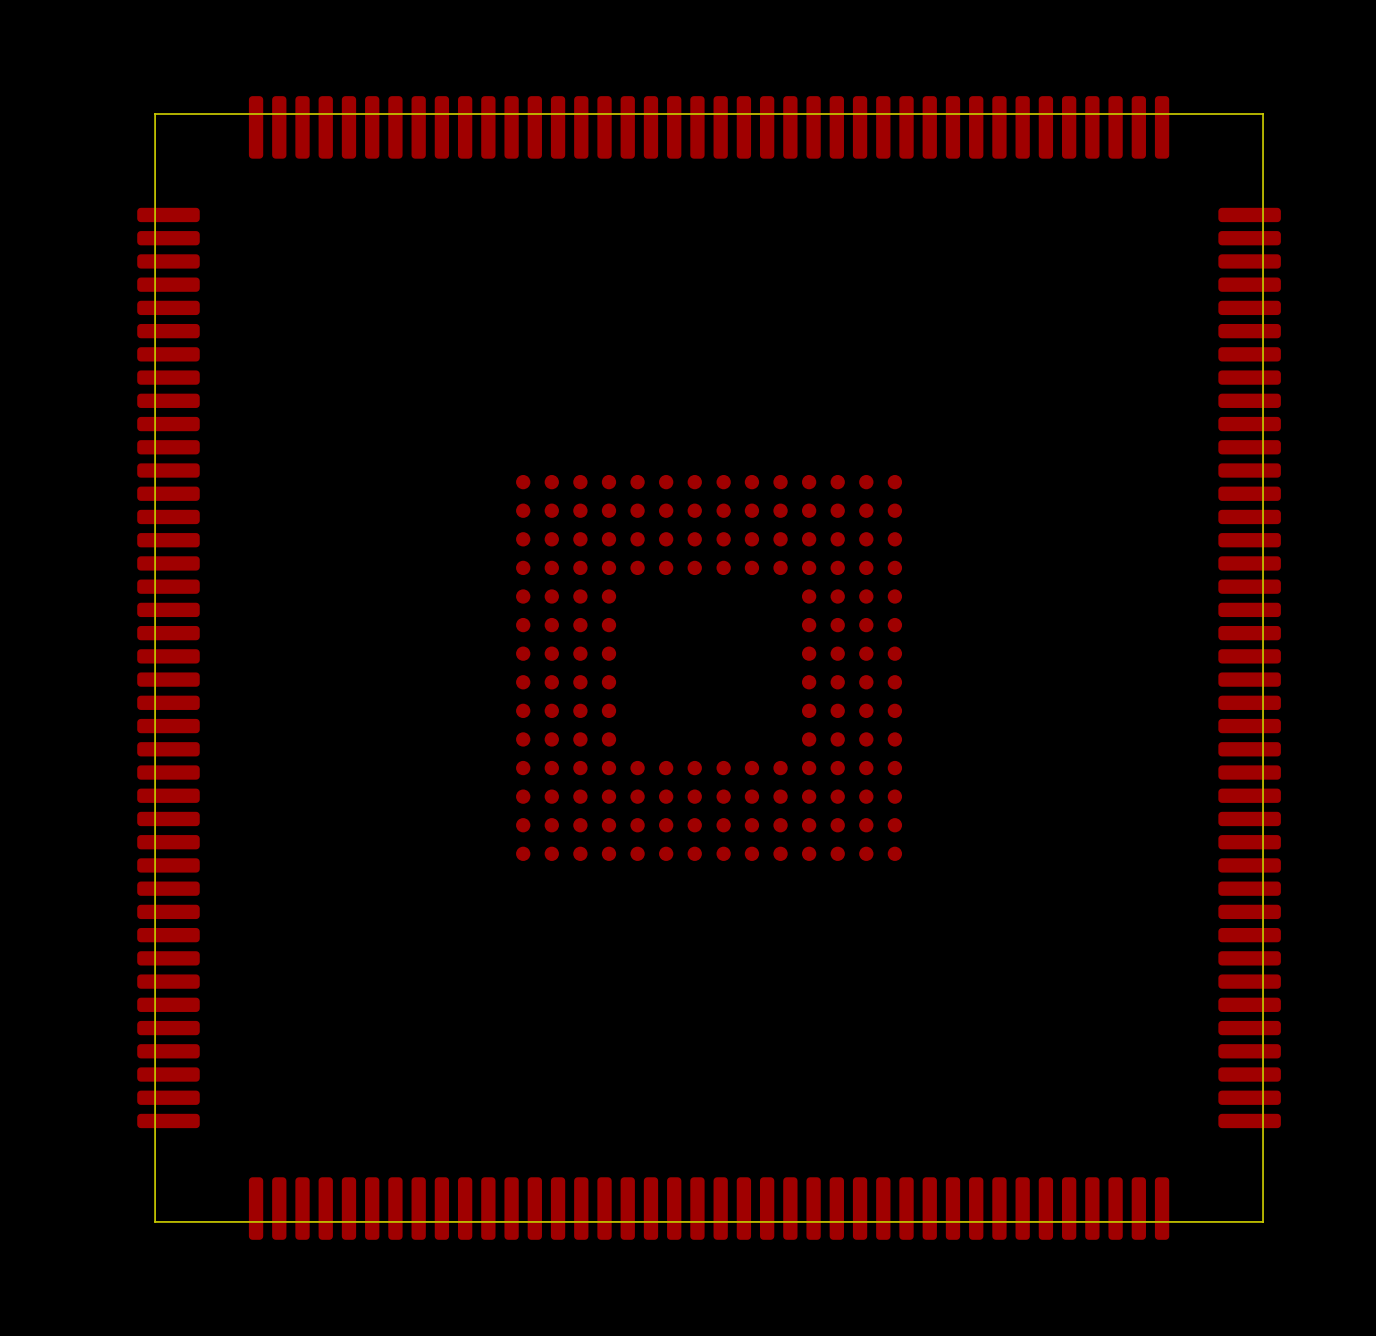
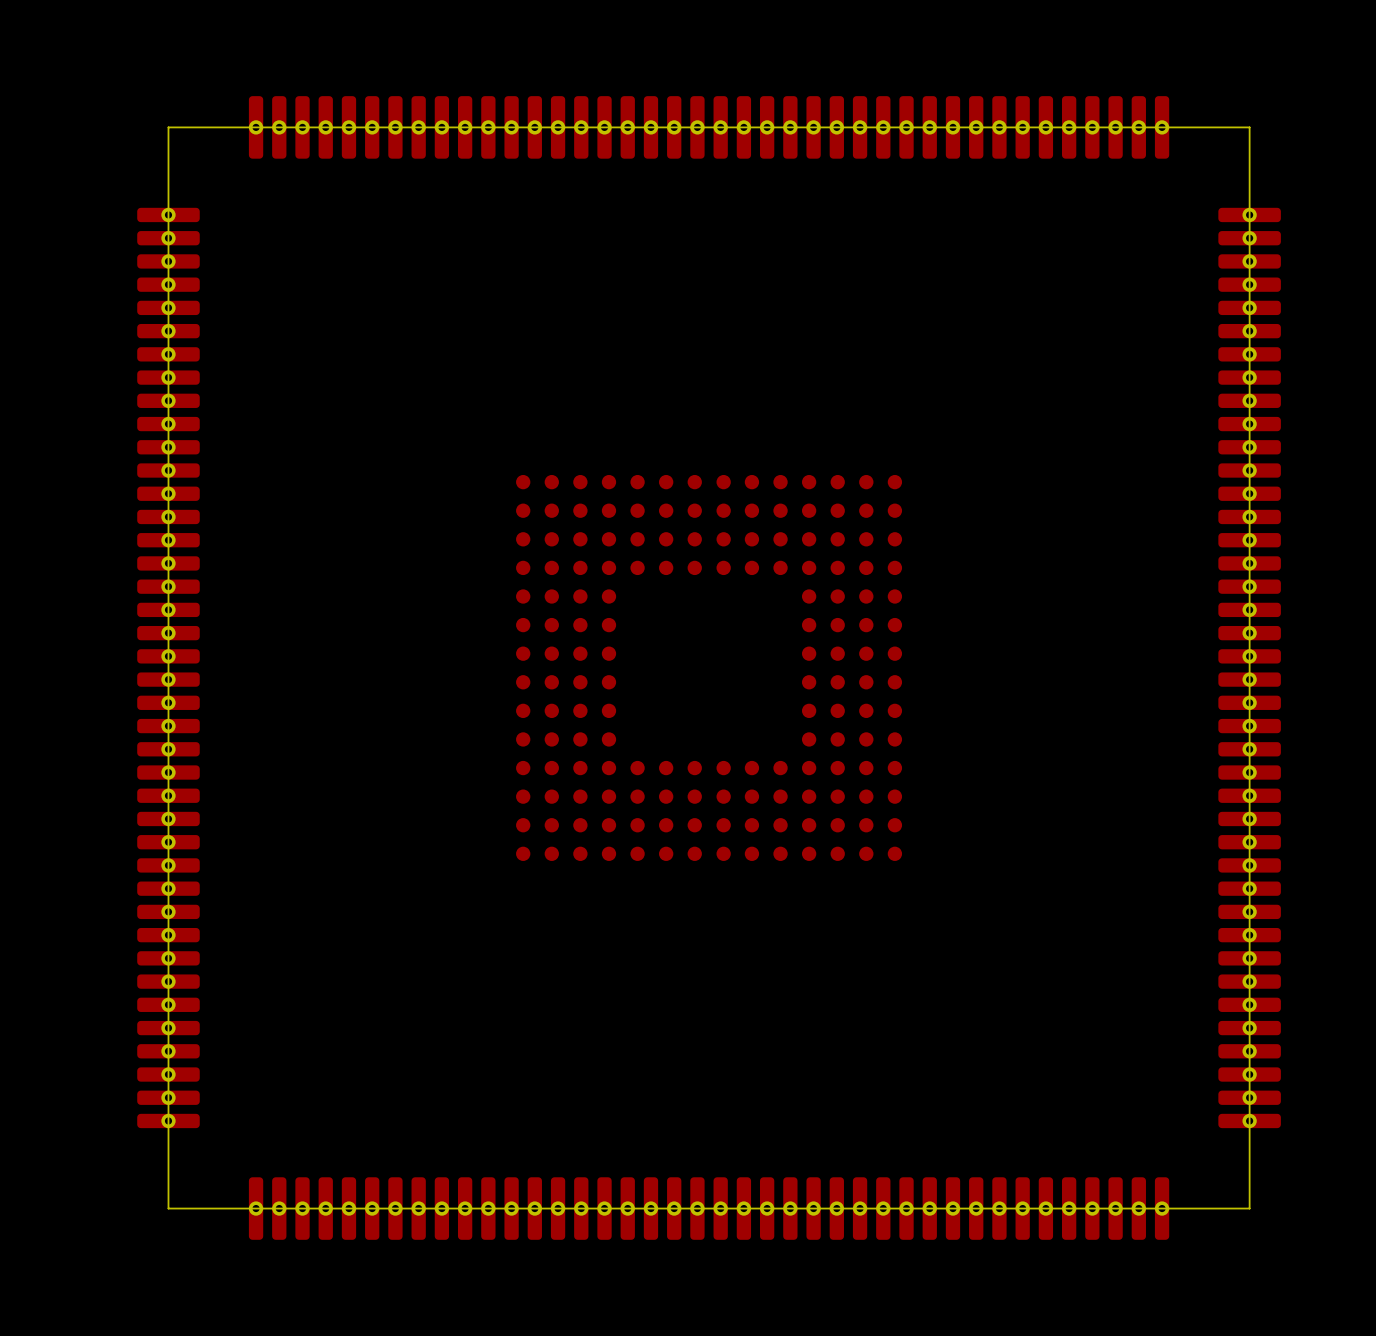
part footprint: [137, 96, 1281, 1240] -> [137, 96, 1281, 1240]
board edge: (1263, 114) (155, 114) (155, 1221) (1263, 1221) (1263, 114) -> none

